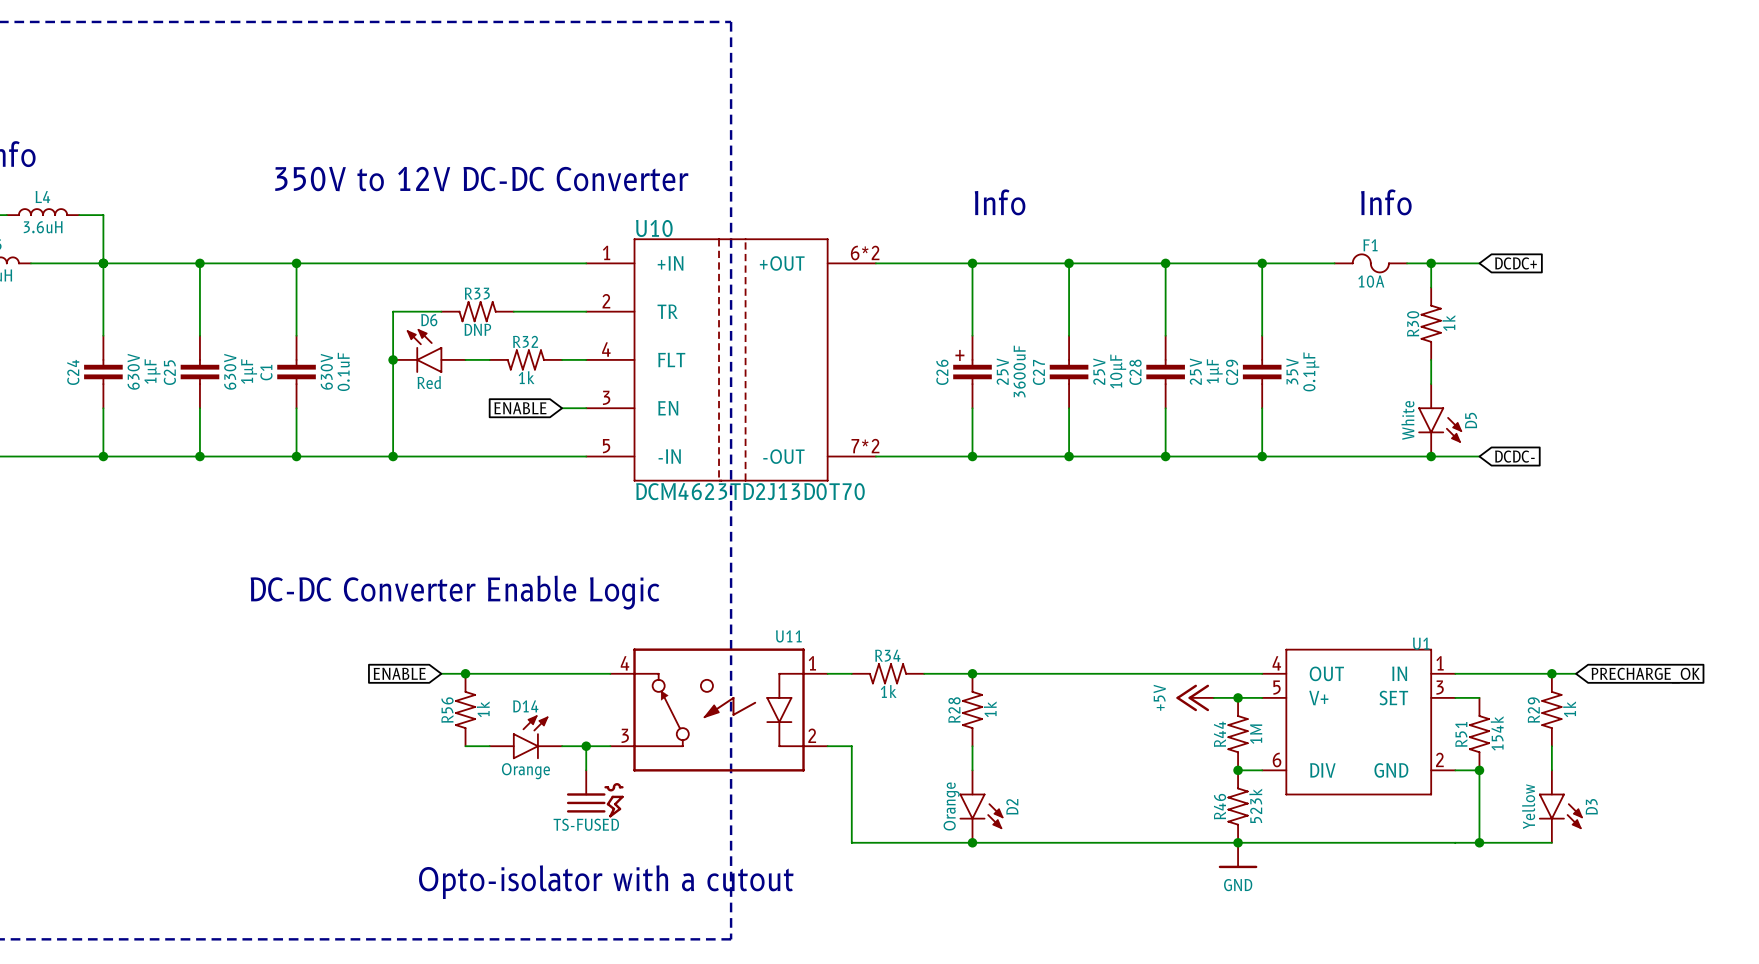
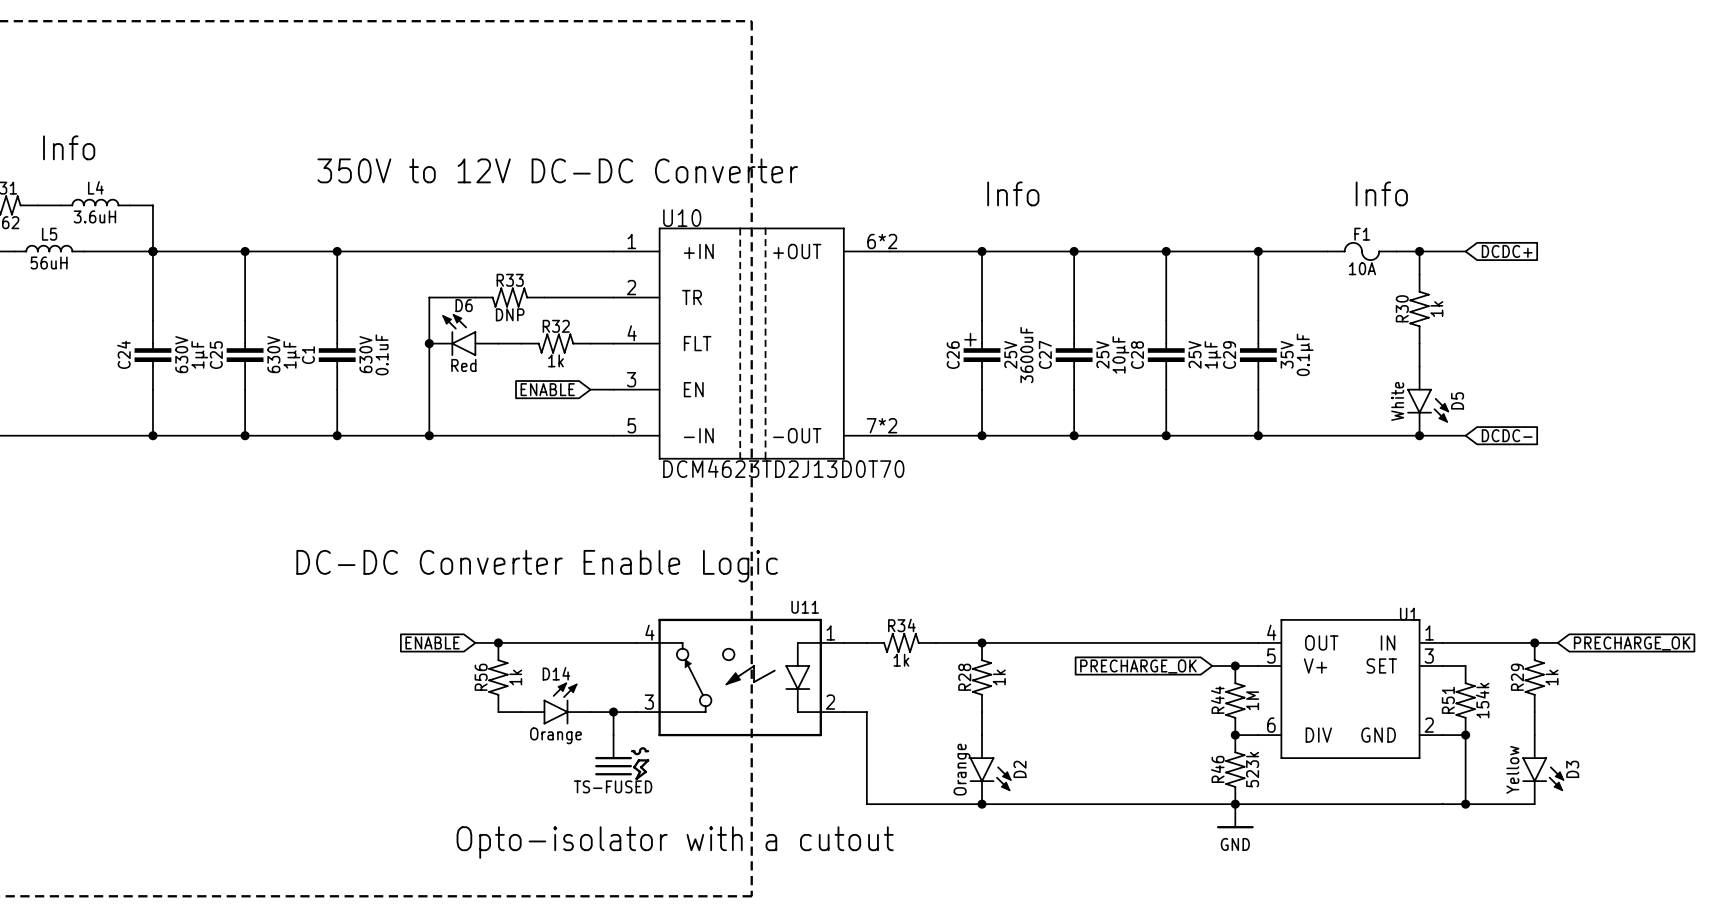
power symbol: +5V (1195, 697) -> none
global label: none -> PRECHARGE_OK (1138, 666)

